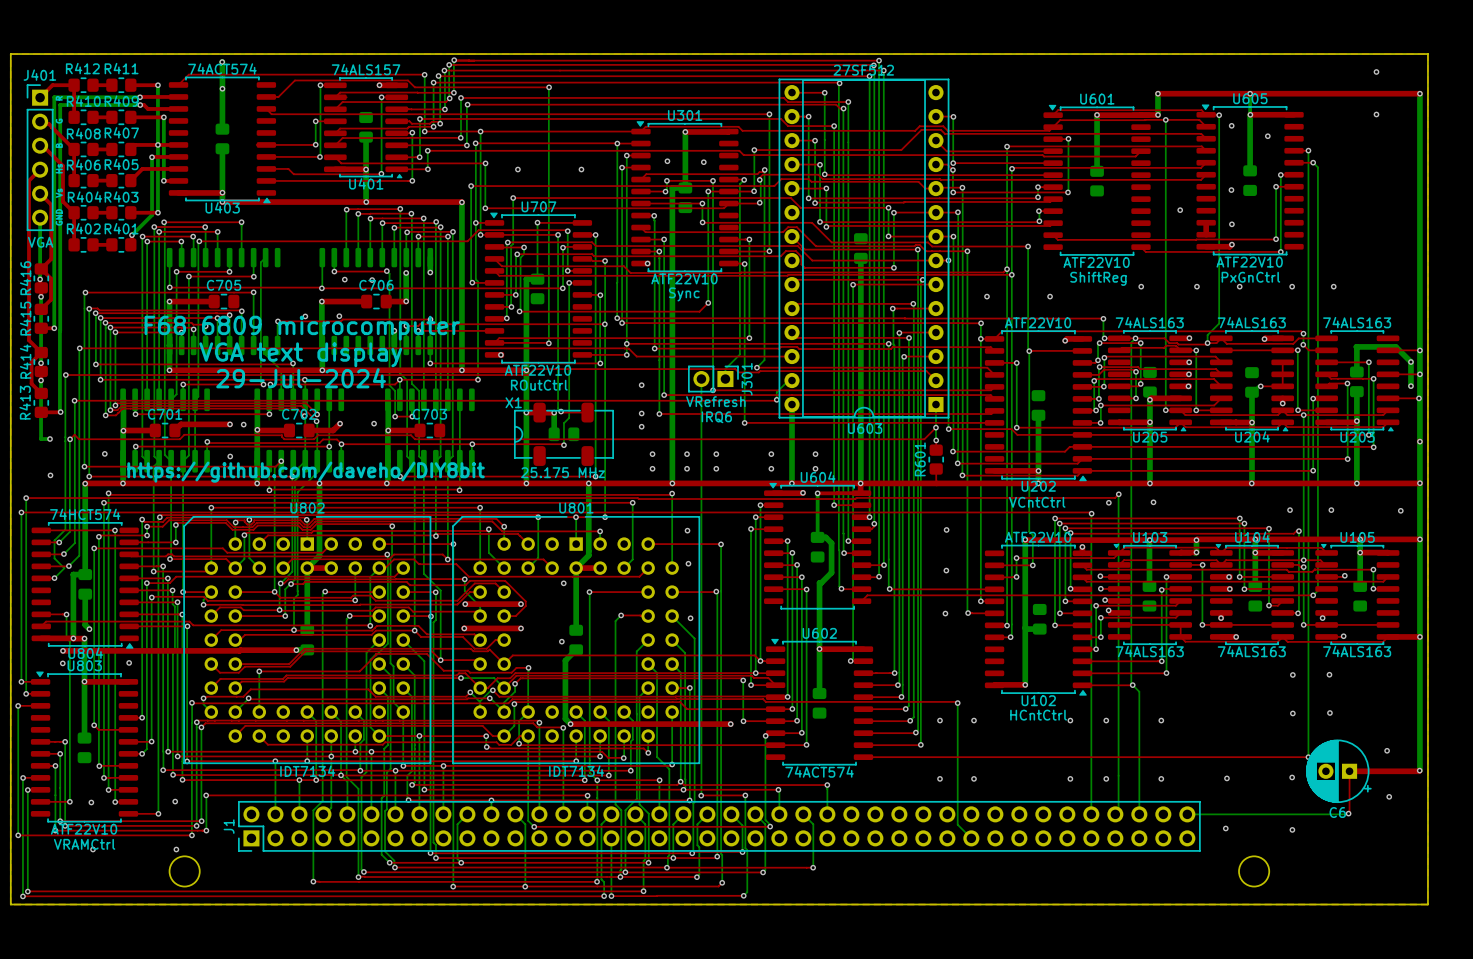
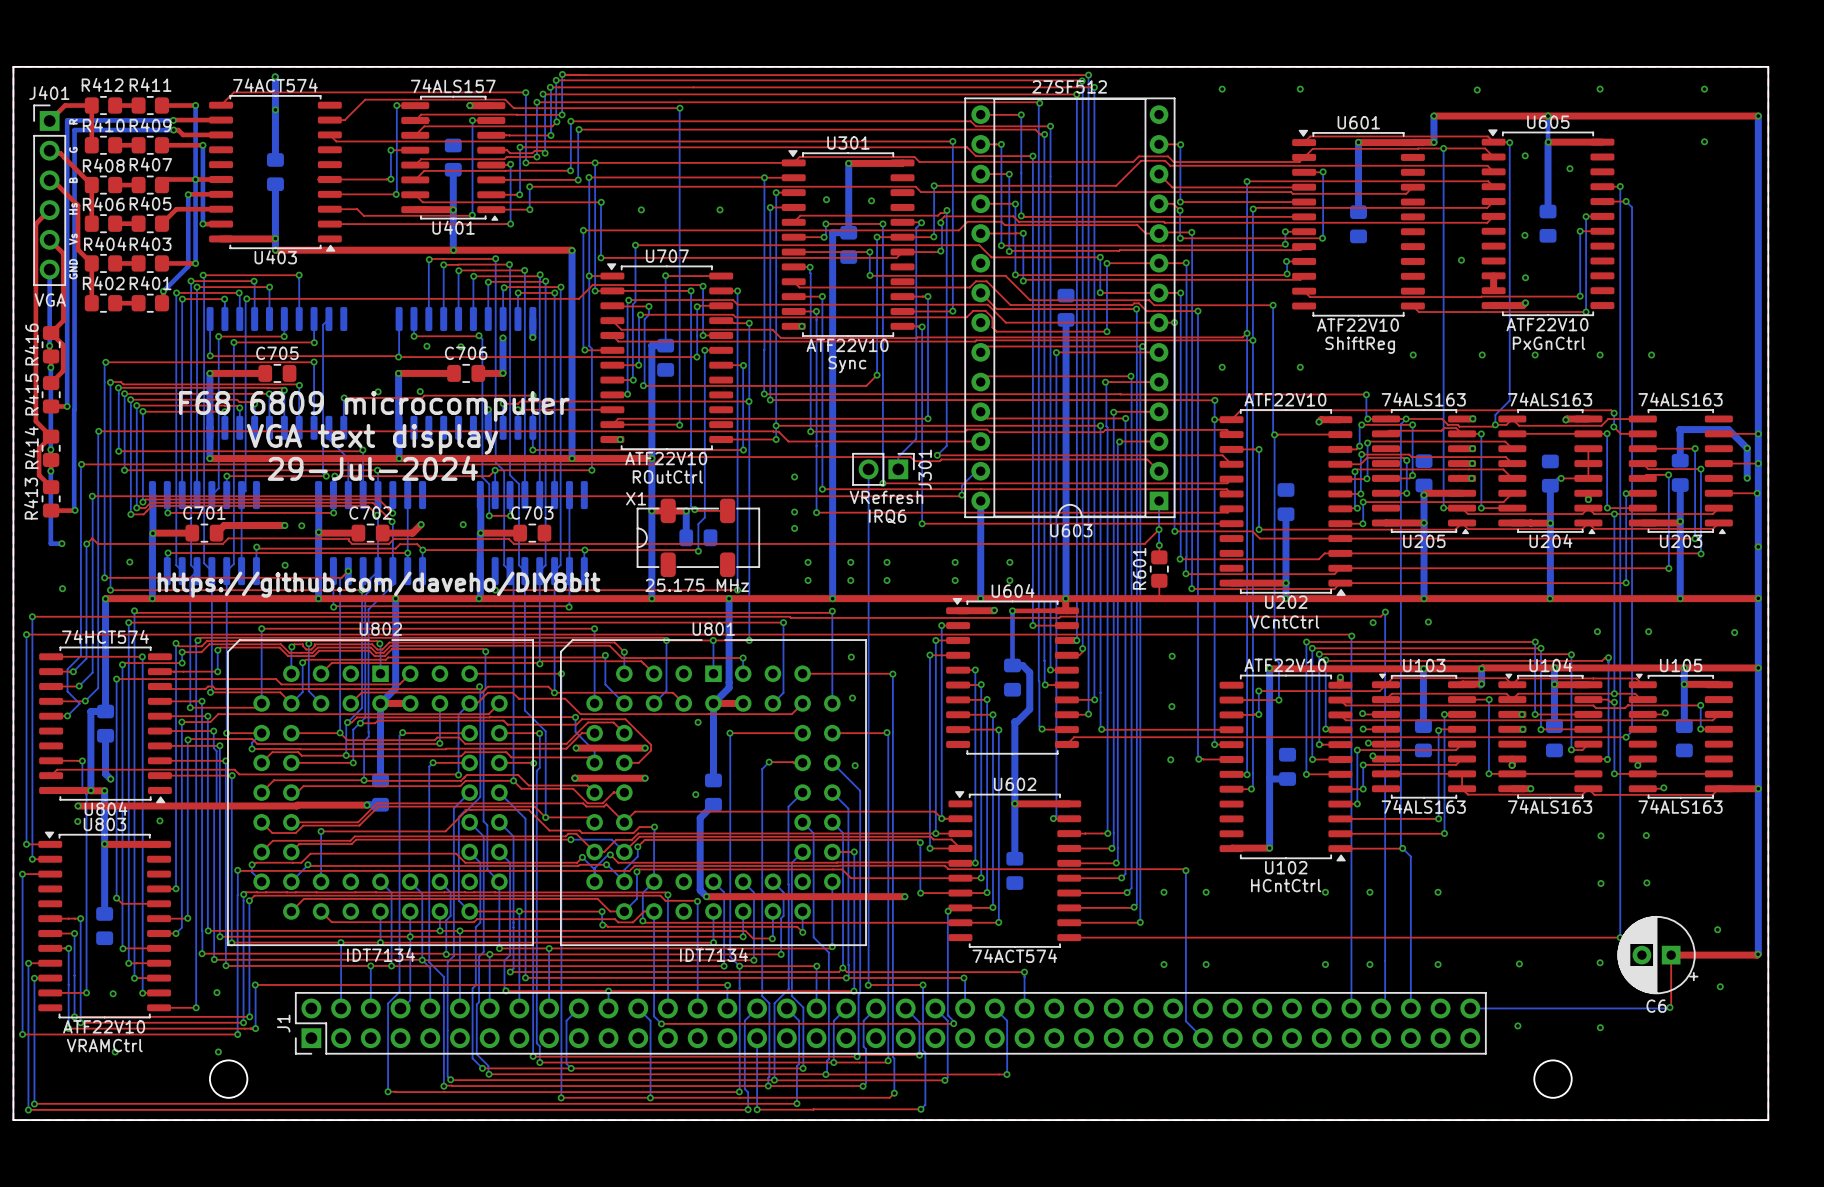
via: none -> (1222, 89)
via: none -> (1300, 89)
via: none -> (1600, 89)
via: none -> (1477, 90)

